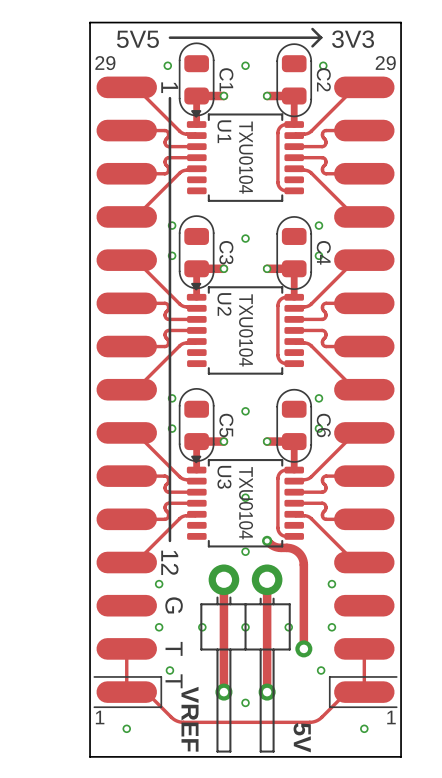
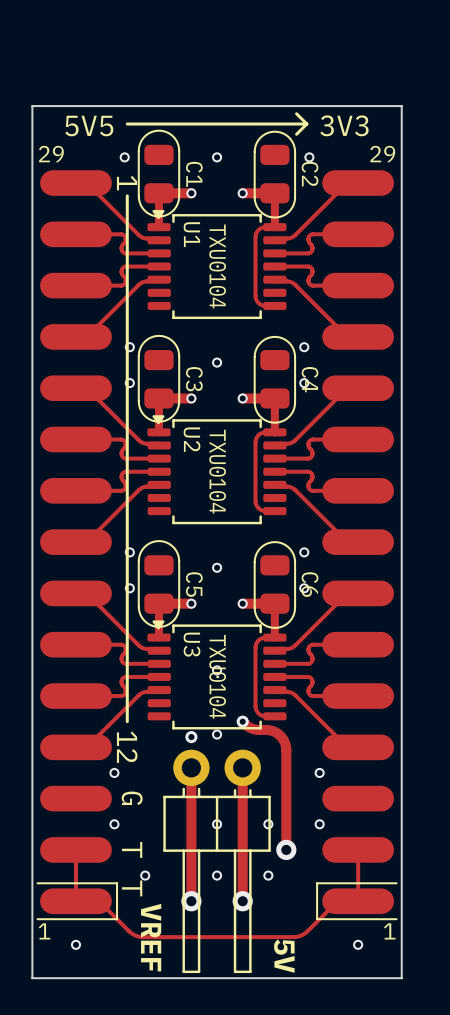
via: none -> (191, 737)
via: (202, 627) -> none
via position: (169, 670) -> (145, 875)
via: none -> (217, 875)
via: none -> (268, 875)
via: (321, 670) -> none
via: (245, 702) -> none

